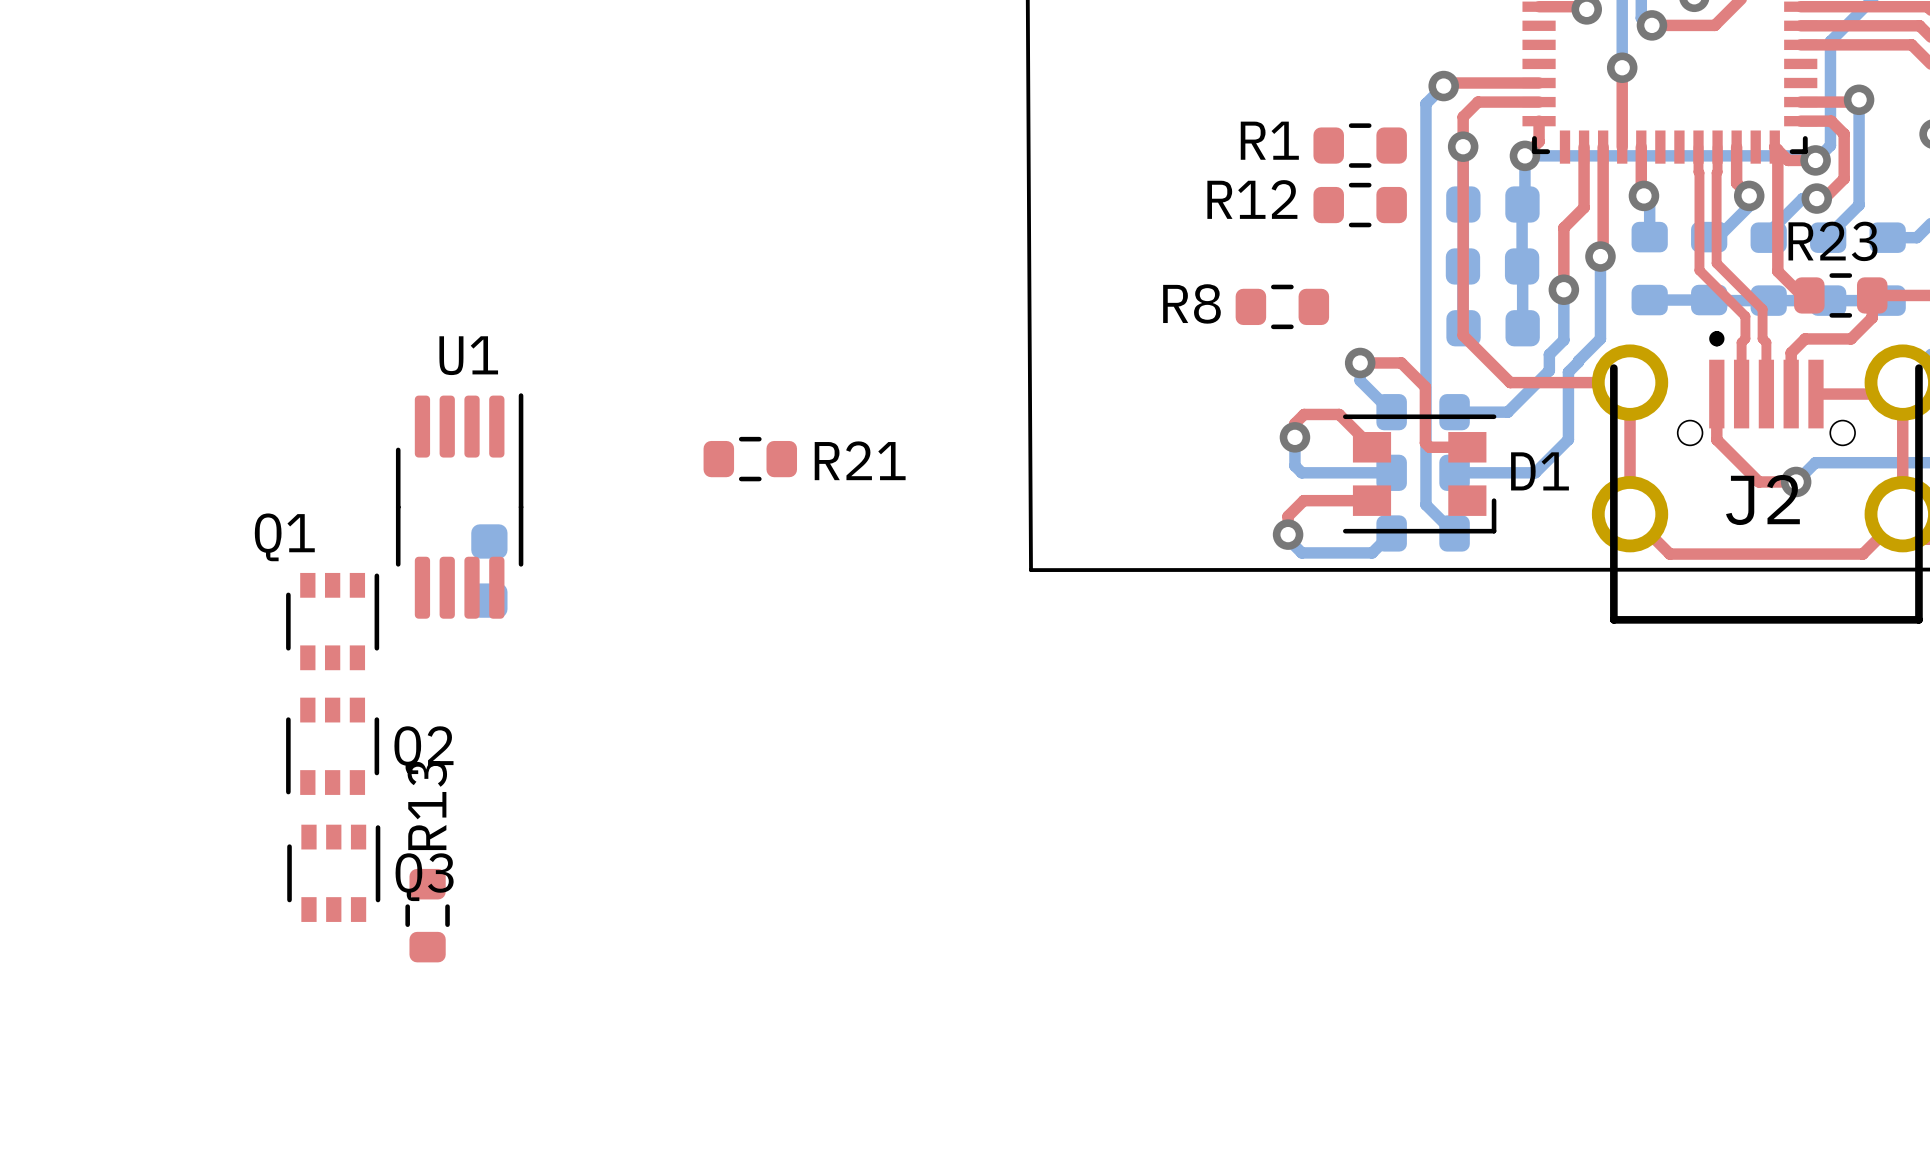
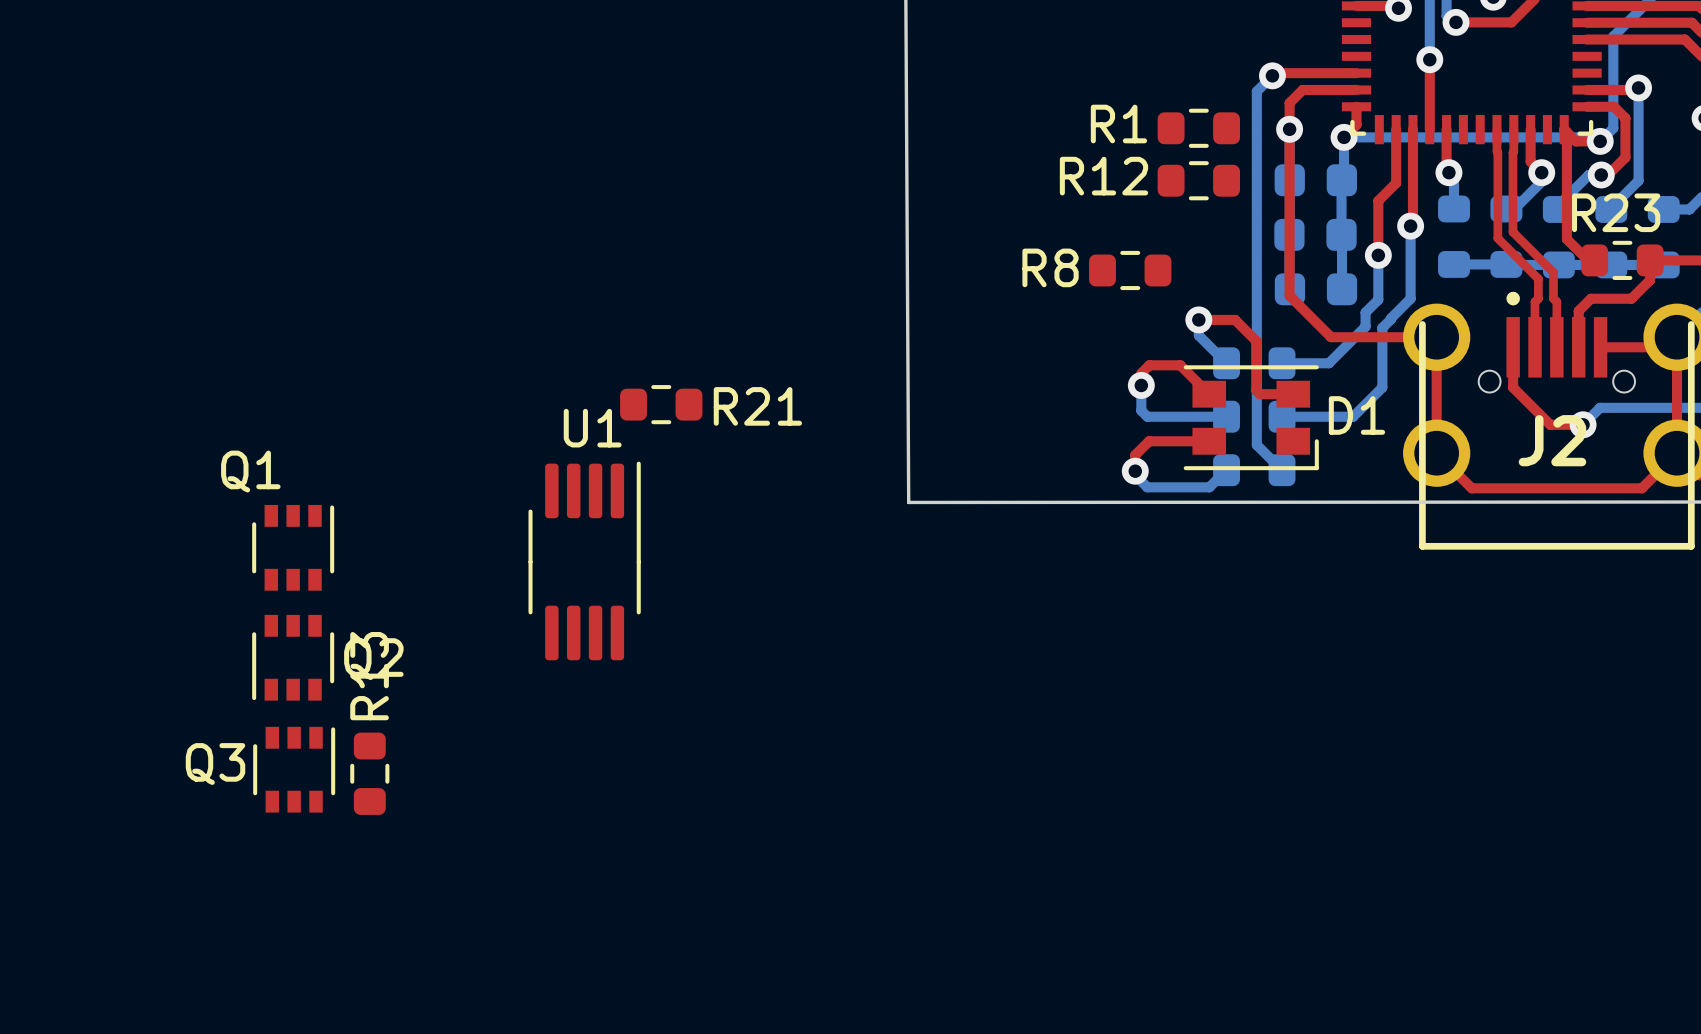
U1 position: (459, 506) -> (584, 560)
part: (489, 571) -> none
Q3 name position: Q3 (424, 877) -> Q3 (215, 764)
R13 position: (427, 915) -> (369, 773)

